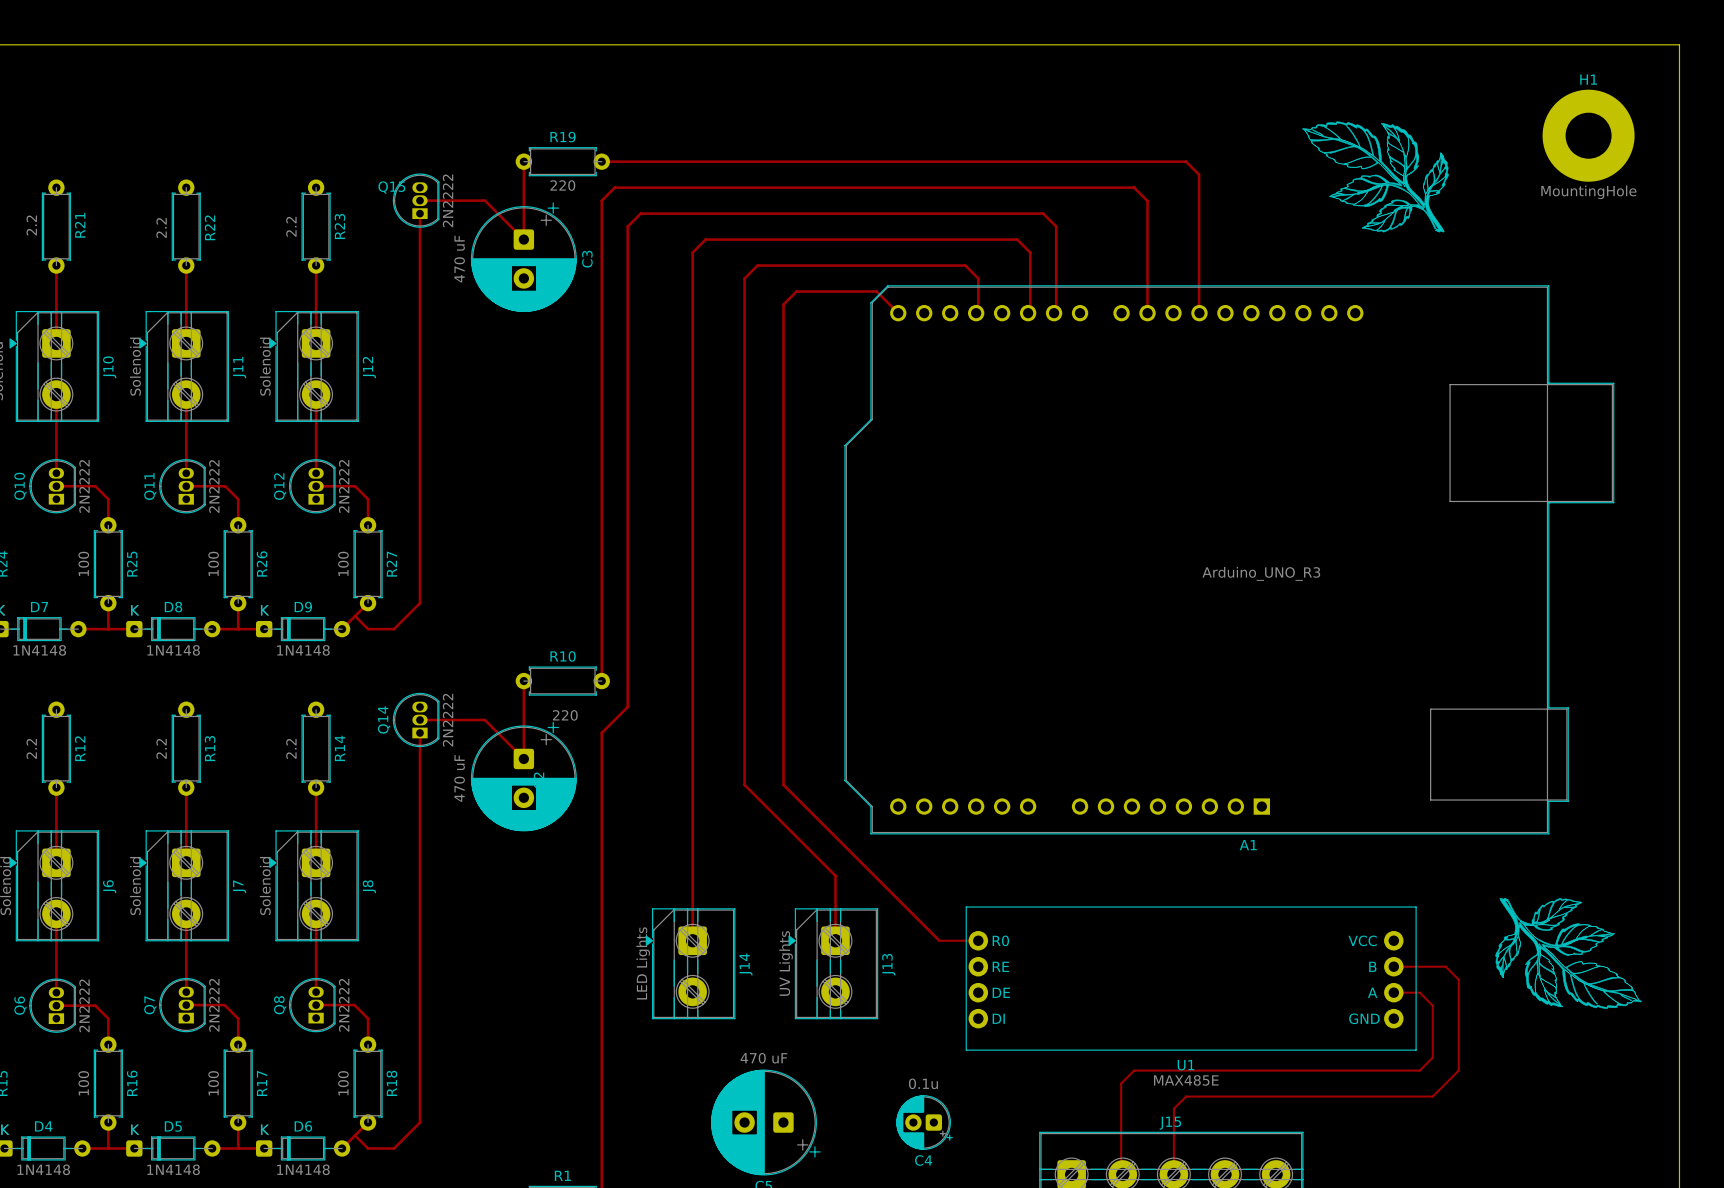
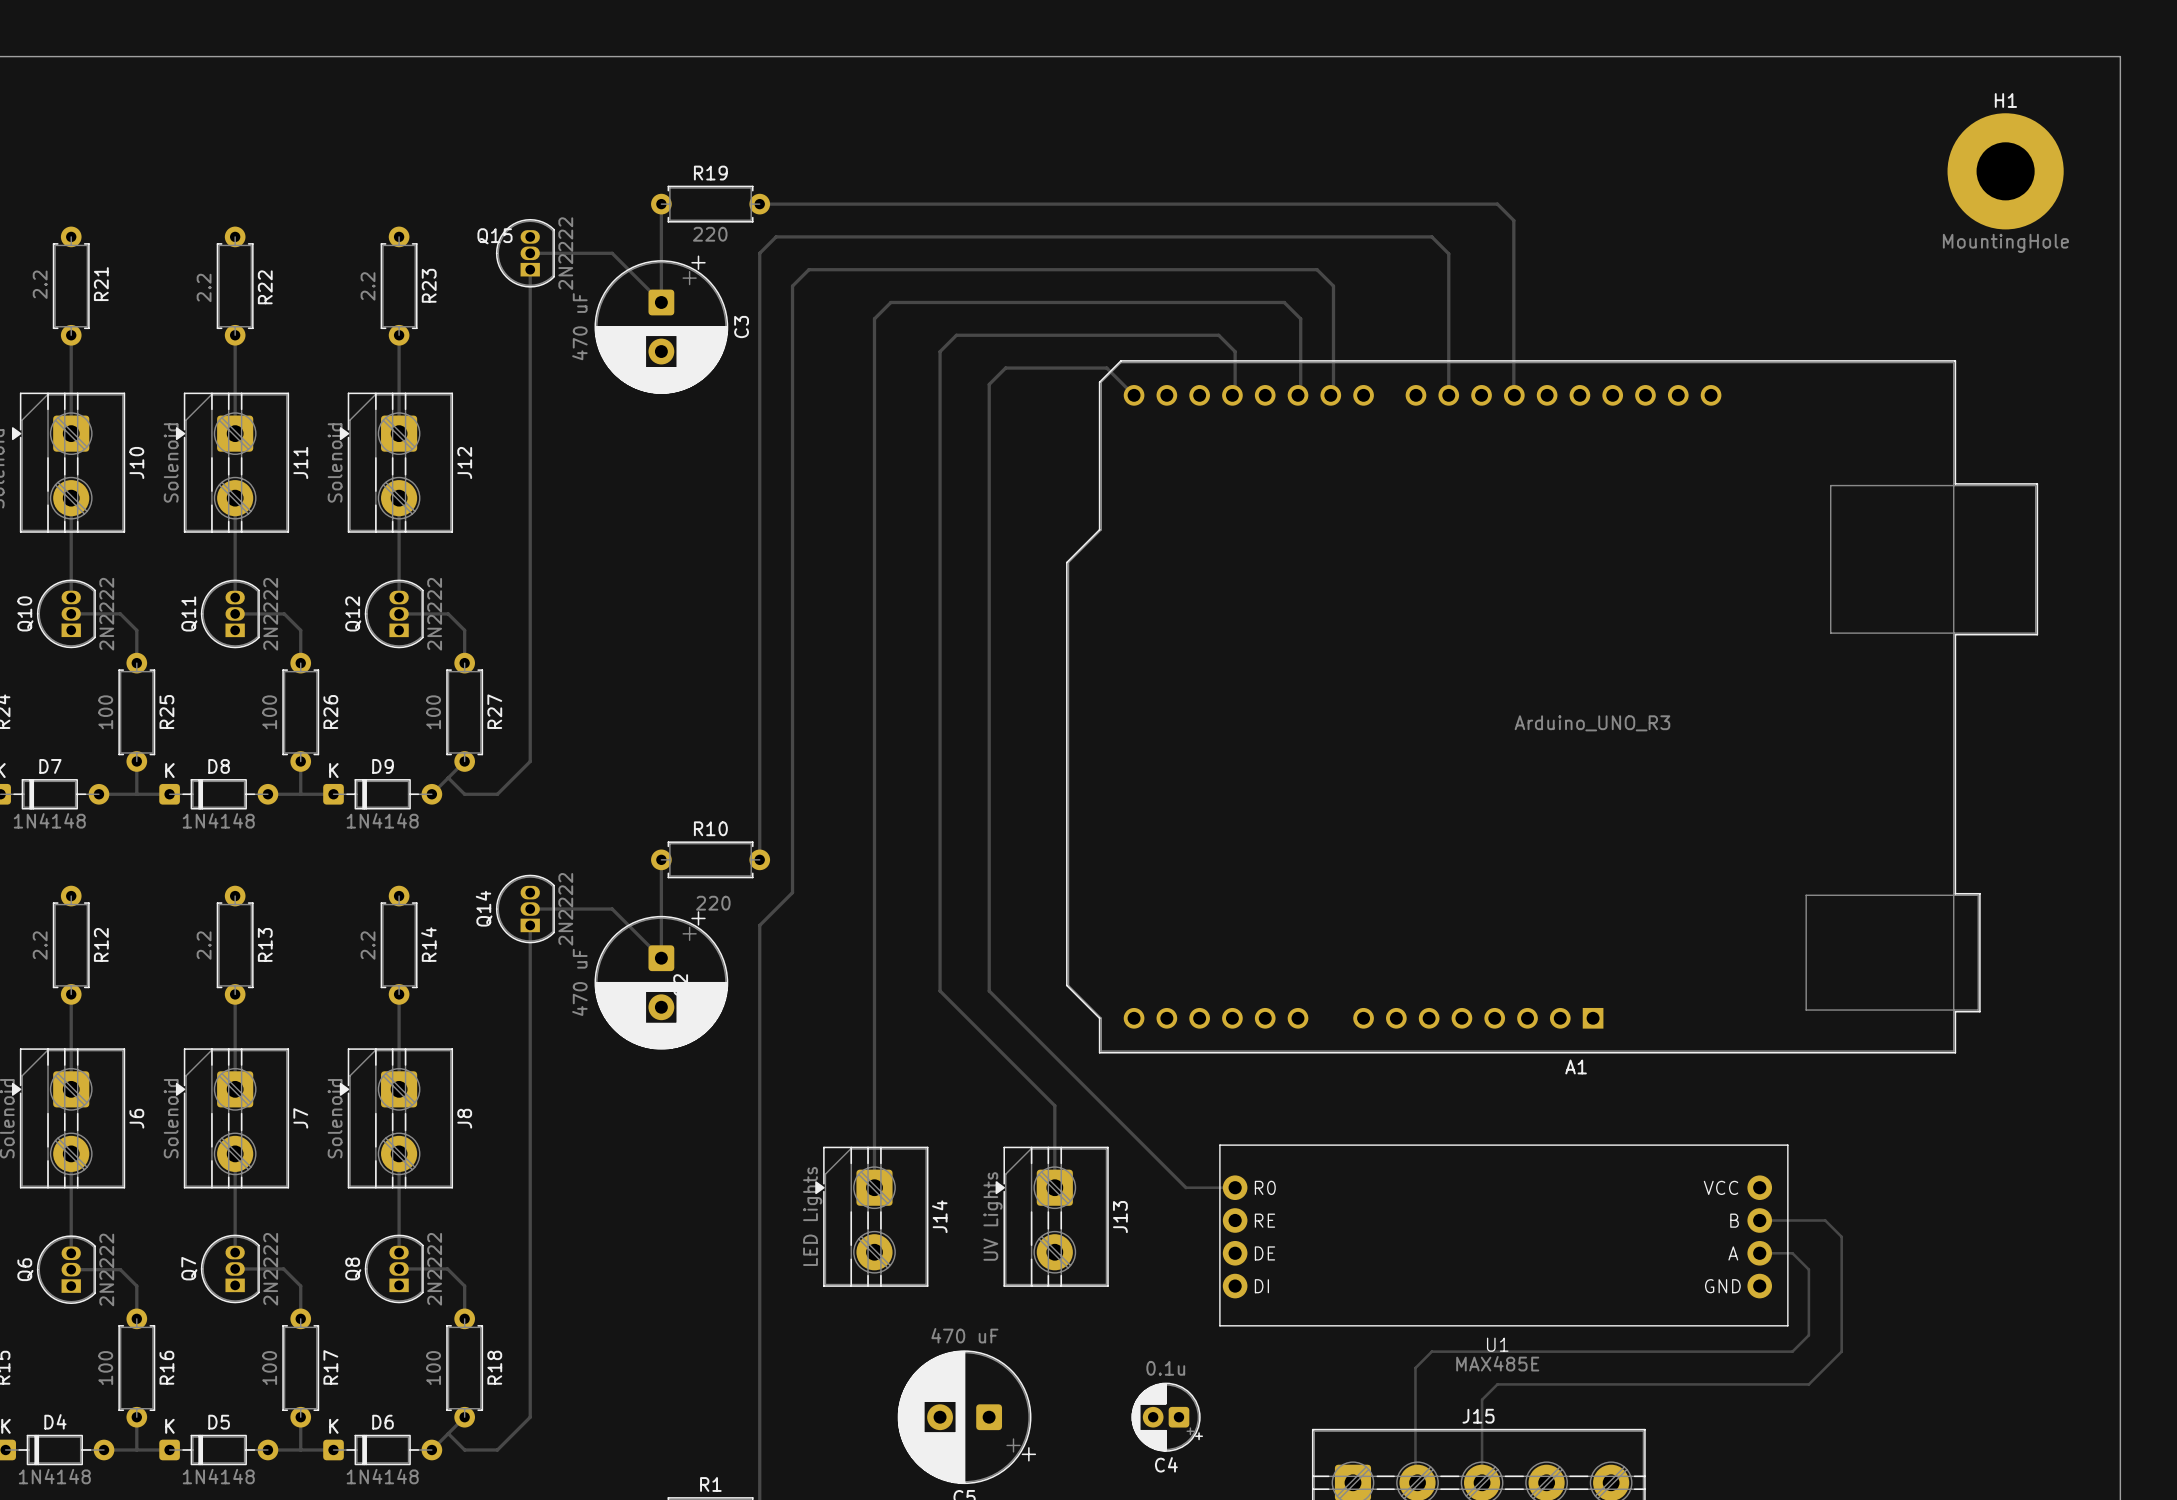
drawing: [1302, 121, 1449, 233] -> none
drawing: [1495, 898, 1642, 1009] -> none

